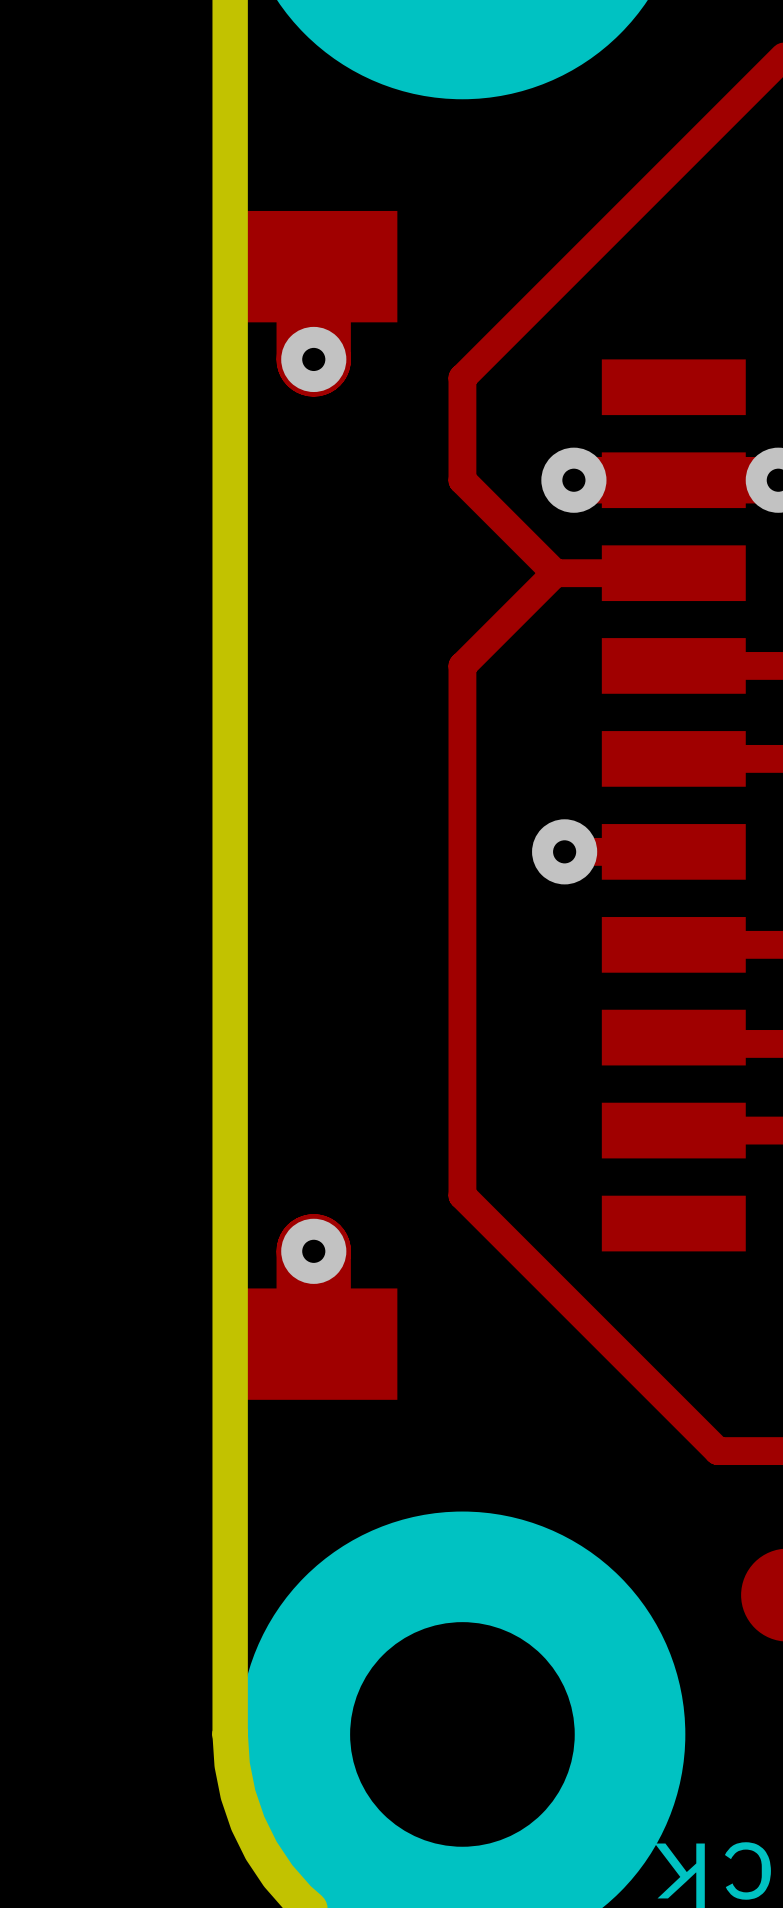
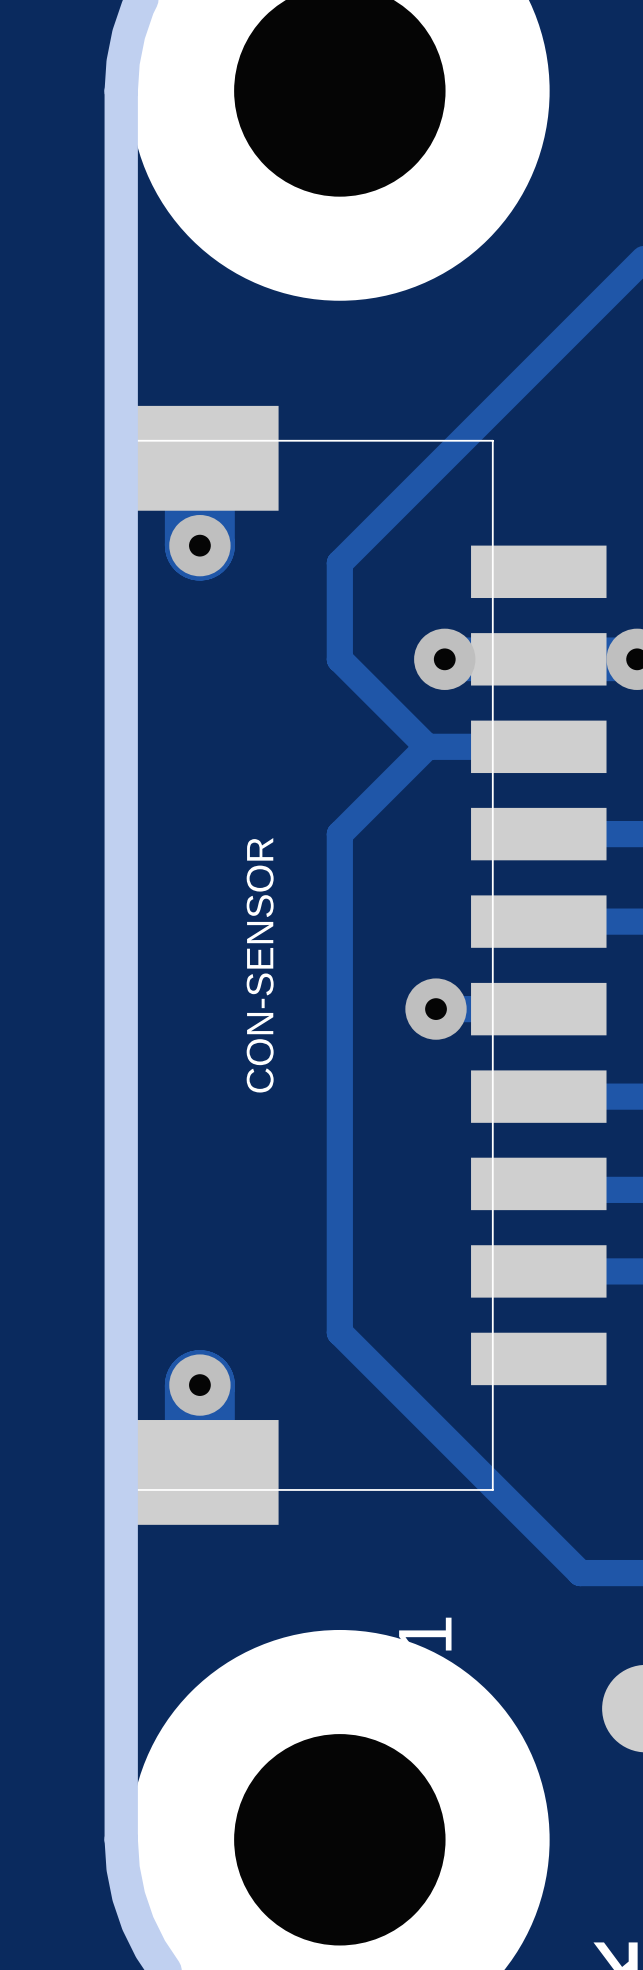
part: (487, 805) -> none
part: none -> CON-SENSOR (363, 965)

